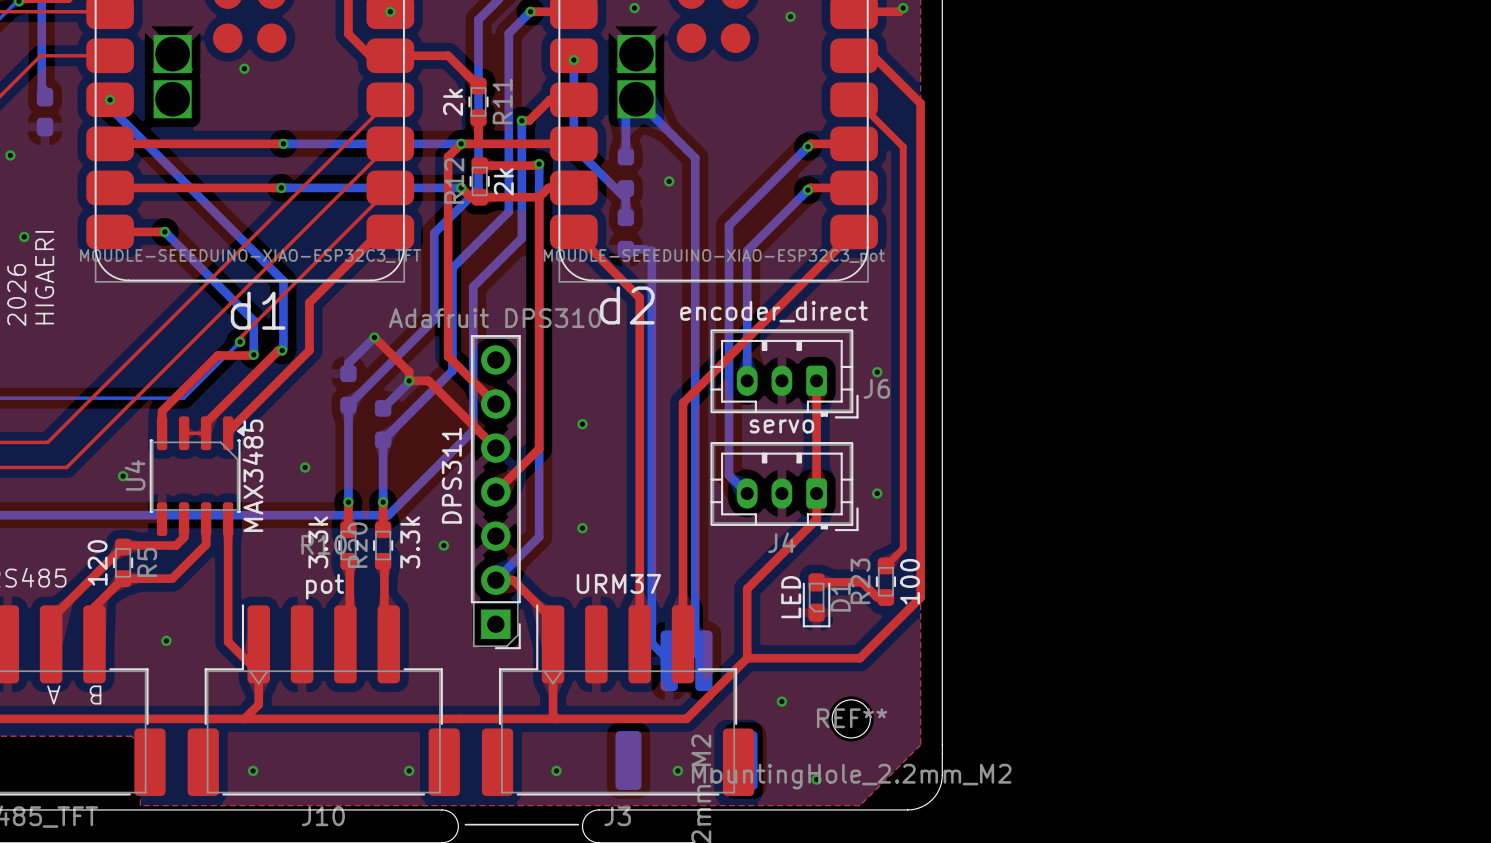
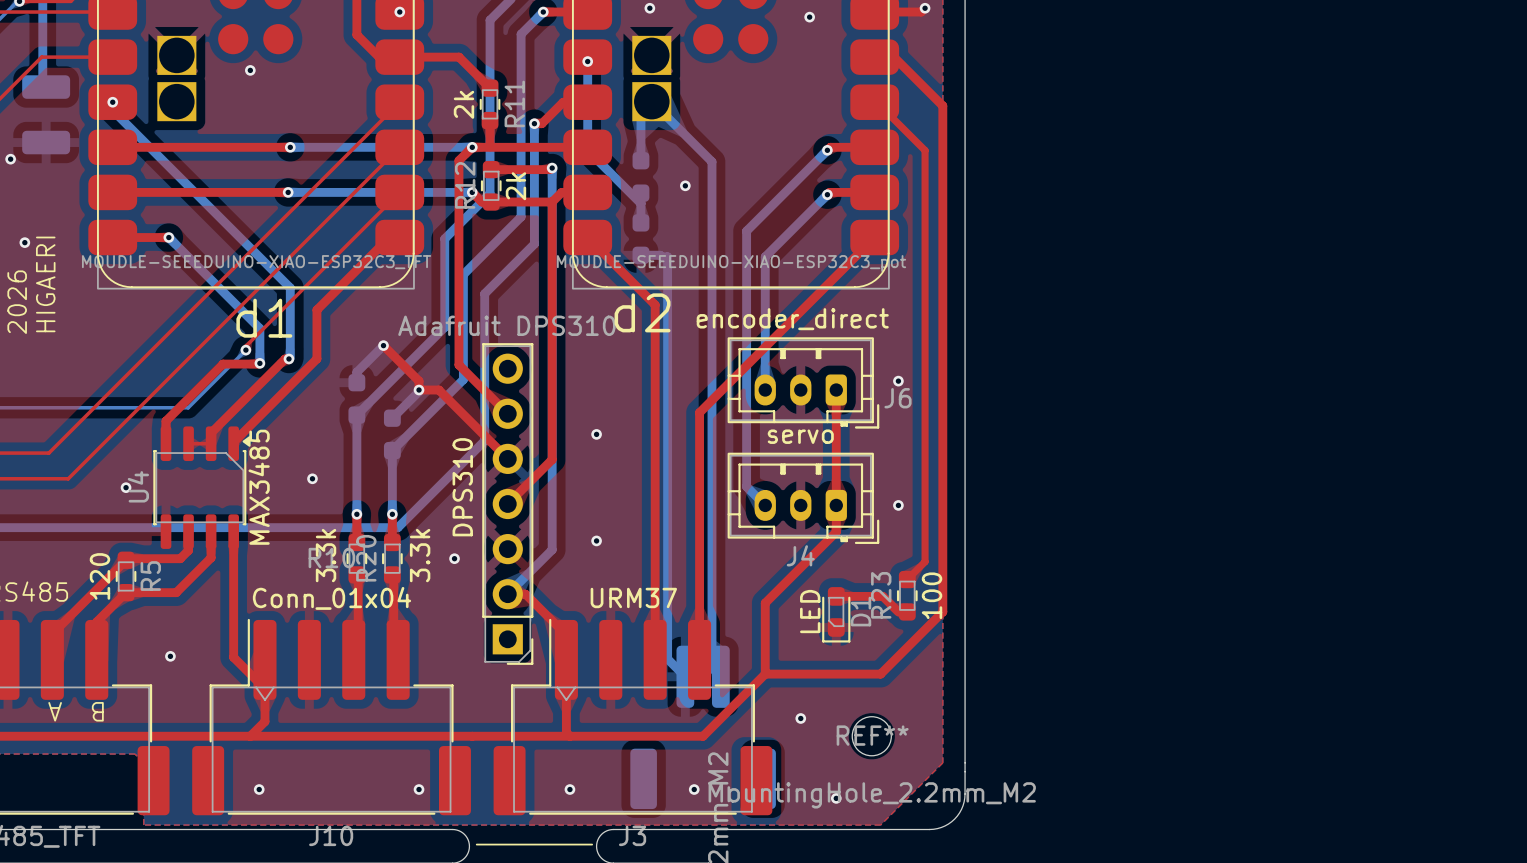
part footprint: [36, 87, 54, 137] -> [22, 75, 71, 155]
DPS311 name: DPS311 (451, 475) -> DPS310 (462, 487)
J10 value: pot (324, 586) -> Conn_01x04 (331, 598)

